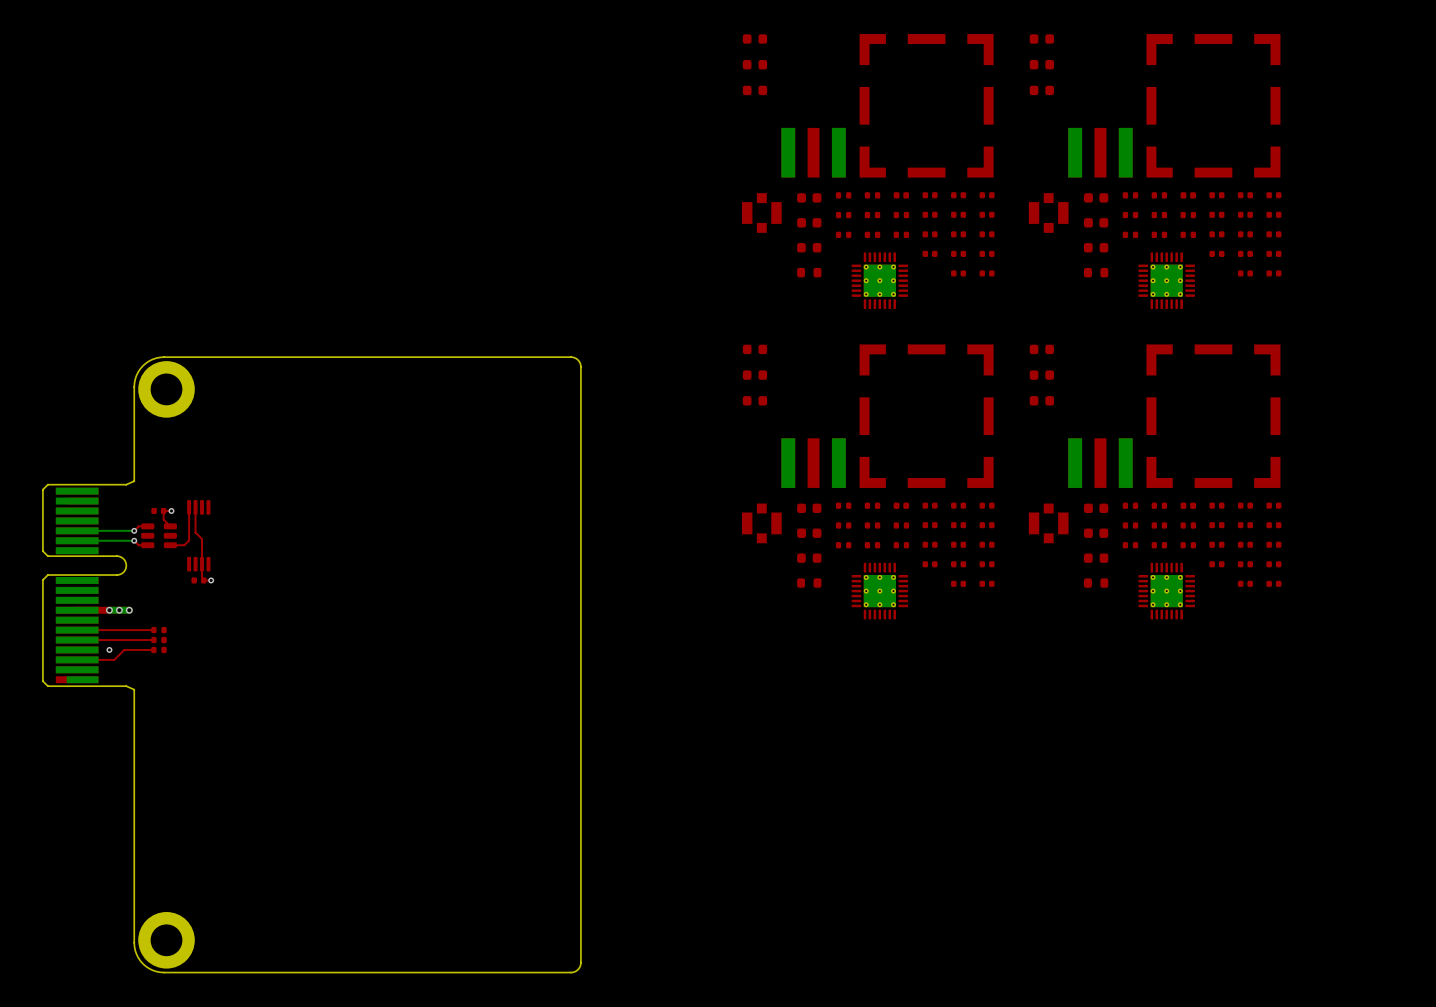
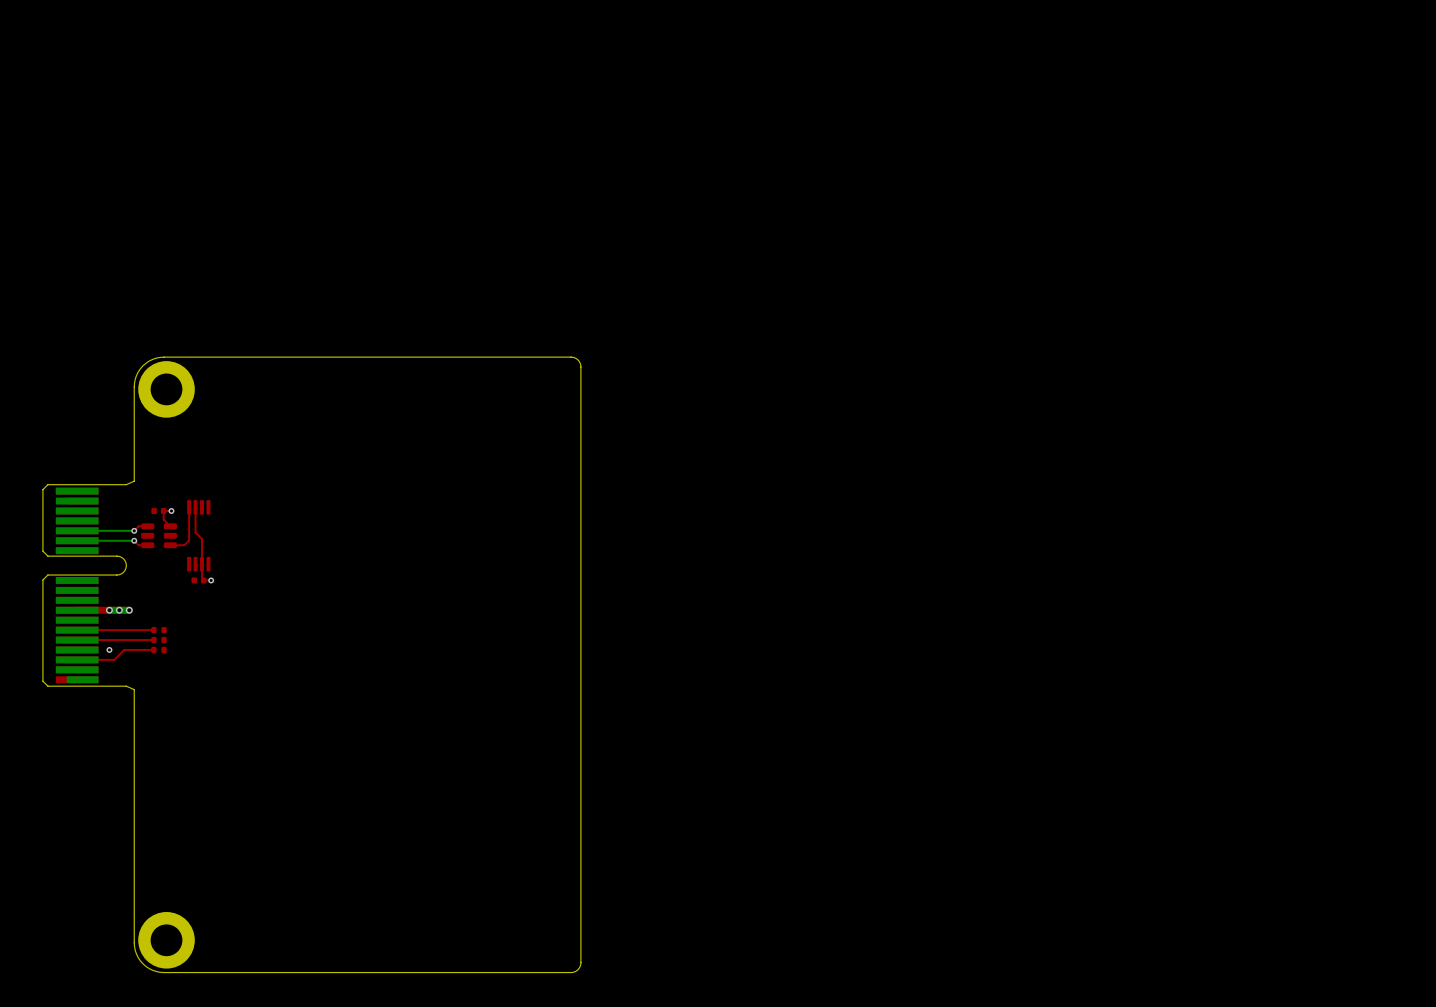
part: (754, 39) -> none
part: (1041, 39) -> none
part: (754, 64) -> none
part: (1041, 64) -> none
part: (754, 90) -> none
part: (1041, 90) -> none
part: (926, 105) -> none
part: (1213, 105) -> none
part: (813, 152) -> none
part: (1100, 152) -> none
part: (843, 195) -> none
part: (872, 195) -> none
part: (901, 195) -> none
part: (930, 195) -> none
part: (958, 195) -> none
part: (987, 195) -> none
part: (1130, 195) -> none
part: (1159, 195) -> none
part: (1188, 195) -> none
part: (1216, 195) -> none
part: (1245, 195) -> none
part: (1273, 195) -> none
part: (809, 197) -> none
part: (1096, 197) -> none
part: (761, 213) -> none
part: (1048, 213) -> none
part: (930, 214) -> none
part: (958, 214) -> none
part: (987, 214) -> none
part: (1216, 214) -> none
part: (1245, 214) -> none
part: (1273, 214) -> none
part: (843, 215) -> none
part: (872, 215) -> none
part: (901, 215) -> none
part: (1130, 215) -> none
part: (1159, 215) -> none
part: (1188, 215) -> none
part: (809, 222) -> none
part: (1096, 222) -> none
part: (843, 234) -> none
part: (872, 234) -> none
part: (901, 234) -> none
part: (930, 234) -> none
part: (958, 234) -> none
part: (987, 234) -> none
part: (1130, 234) -> none
part: (1159, 234) -> none
part: (1188, 234) -> none
part: (1216, 234) -> none
part: (1245, 234) -> none
part: (1273, 234) -> none
part: (809, 247) -> none
part: (1096, 247) -> none
part: (930, 253) -> none
part: (958, 253) -> none
part: (987, 253) -> none
part: (1216, 253) -> none
part: (1245, 253) -> none
part: (1273, 253) -> none
part: (809, 272) -> none
part: (1096, 272) -> none
part: (958, 273) -> none
part: (987, 273) -> none
part: (1245, 273) -> none
part: (1273, 273) -> none
part: (879, 280) -> none
part: (1166, 280) -> none
part: (754, 349) -> none
part: (1041, 349) -> none
part: (754, 375) -> none
part: (1041, 375) -> none
part: (754, 400) -> none
part: (1041, 400) -> none
part: (926, 416) -> none
part: (1213, 416) -> none
part: (813, 463) -> none
part: (1100, 463) -> none
part: (843, 505) -> none
part: (872, 505) -> none
part: (901, 505) -> none
part: (930, 505) -> none
part: (958, 505) -> none
part: (987, 505) -> none
part: (1130, 505) -> none
part: (1159, 505) -> none
part: (1188, 505) -> none
part: (1216, 505) -> none
part: (1245, 505) -> none
part: (1273, 505) -> none
part: (809, 508) -> none
part: (1096, 508) -> none
part: (761, 523) -> none
part: (1048, 523) -> none
part: (843, 525) -> none
part: (872, 525) -> none
part: (901, 525) -> none
part: (930, 525) -> none
part: (958, 525) -> none
part: (987, 525) -> none
part: (1130, 525) -> none
part: (1159, 525) -> none
part: (1188, 525) -> none
part: (1216, 525) -> none
part: (1245, 525) -> none
part: (1273, 525) -> none
part: (809, 533) -> none
part: (1096, 533) -> none
part: (930, 544) -> none
part: (958, 544) -> none
part: (987, 544) -> none
part: (1216, 544) -> none
part: (1245, 544) -> none
part: (1273, 544) -> none
part: (843, 545) -> none
part: (872, 545) -> none
part: (901, 545) -> none
part: (1130, 545) -> none
part: (1159, 545) -> none
part: (1188, 545) -> none
part: (809, 558) -> none
part: (1096, 558) -> none
part: (930, 564) -> none
part: (958, 564) -> none
part: (987, 564) -> none
part: (1216, 564) -> none
part: (1245, 564) -> none
part: (1273, 564) -> none
part: (809, 583) -> none
part: (958, 583) -> none
part: (987, 583) -> none
part: (1096, 583) -> none
part: (1245, 583) -> none
part: (1273, 583) -> none
part: (879, 591) -> none
part: (1166, 591) -> none

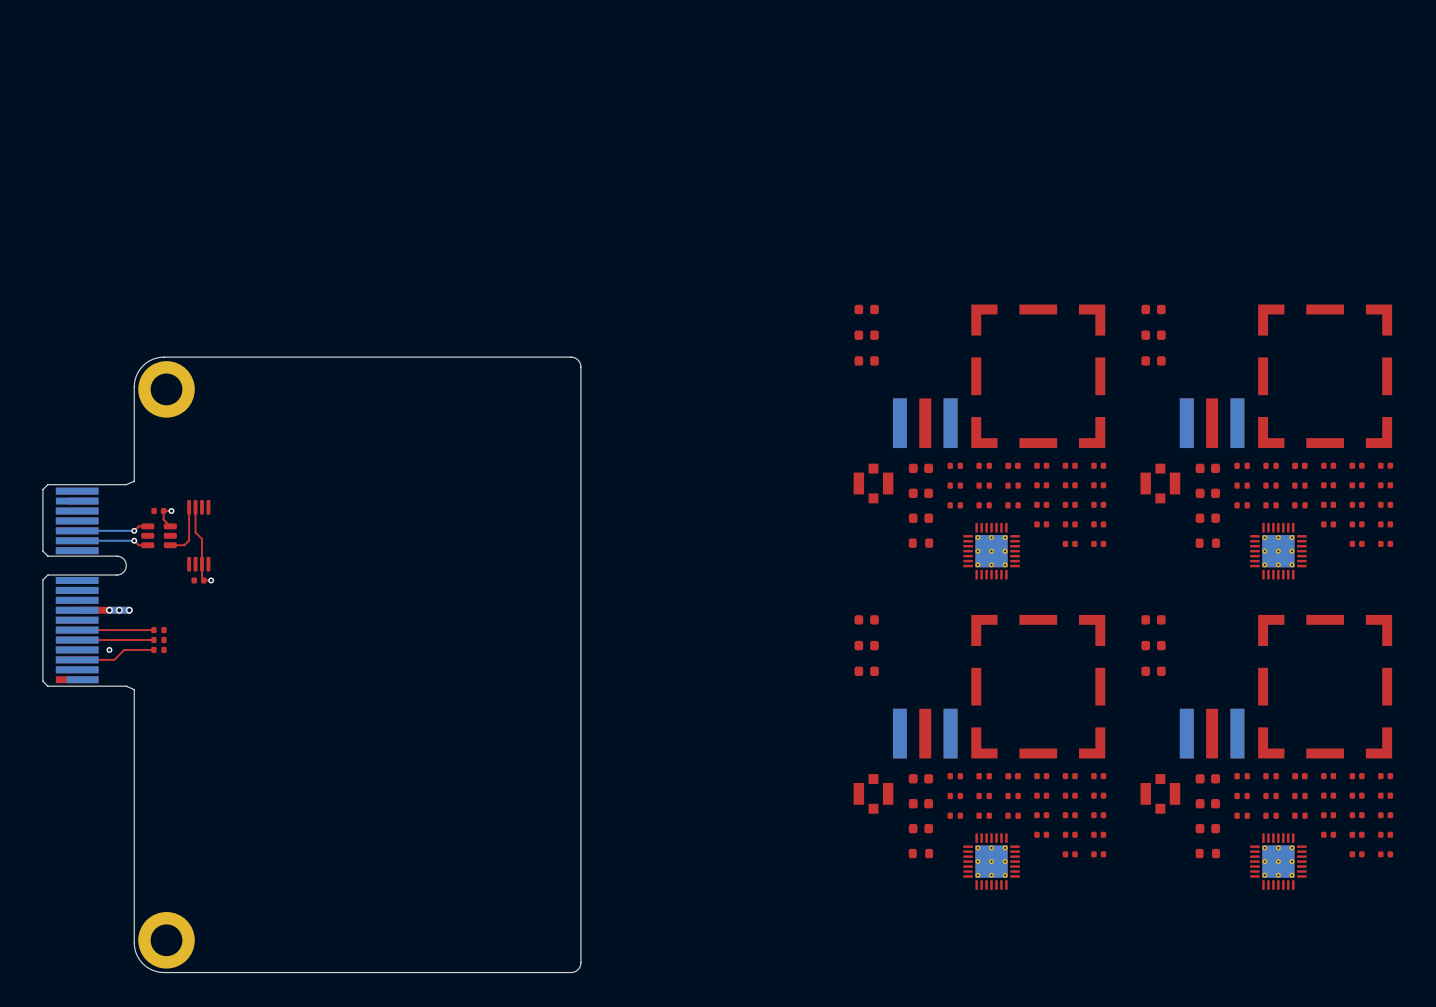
part: none -> (866, 309)
part: none -> (1153, 309)
part: none -> (866, 335)
part: none -> (1153, 335)
part: none -> (866, 360)
part: none -> (1153, 360)
part: none -> (1038, 376)
part: none -> (1325, 376)
part: none -> (925, 423)
part: none -> (1212, 423)
part: none -> (955, 465)
part: none -> (984, 465)
part: none -> (1013, 465)
part: none -> (1041, 465)
part: none -> (1070, 465)
part: none -> (1098, 465)
part: none -> (1242, 465)
part: none -> (1271, 465)
part: none -> (1299, 465)
part: none -> (1328, 465)
part: none -> (1357, 465)
part: none -> (1385, 465)
part: none -> (920, 468)
part: none -> (1207, 468)
part: none -> (873, 483)
part: none -> (1160, 483)
part: none -> (955, 485)
part: none -> (984, 485)
part: none -> (1013, 485)
part: none -> (1041, 485)
part: none -> (1070, 485)
part: none -> (1098, 485)
part: none -> (1242, 485)
part: none -> (1271, 485)
part: none -> (1299, 485)
part: none -> (1328, 485)
part: none -> (1357, 485)
part: none -> (1385, 485)
part: none -> (920, 493)
part: none -> (1207, 493)
part: none -> (1041, 504)
part: none -> (1070, 504)
part: none -> (1098, 504)
part: none -> (1328, 504)
part: none -> (1357, 504)
part: none -> (1385, 504)
part: none -> (955, 505)
part: none -> (984, 505)
part: none -> (1013, 505)
part: none -> (1242, 505)
part: none -> (1271, 505)
part: none -> (1299, 505)
part: none -> (920, 518)
part: none -> (1207, 518)
part: none -> (1041, 524)
part: none -> (1070, 524)
part: none -> (1098, 524)
part: none -> (1328, 524)
part: none -> (1357, 524)
part: none -> (1385, 524)
part: none -> (920, 543)
part: none -> (1070, 543)
part: none -> (1098, 543)
part: none -> (1207, 543)
part: none -> (1357, 543)
part: none -> (1385, 543)
part: none -> (991, 551)
part: none -> (1278, 551)
part: none -> (866, 619)
part: none -> (1153, 619)
part: none -> (866, 645)
part: none -> (1153, 645)
part: none -> (866, 671)
part: none -> (1153, 671)
part: none -> (1038, 686)
part: none -> (1325, 686)
part: none -> (925, 733)
part: none -> (1212, 733)
part: none -> (955, 776)
part: none -> (984, 776)
part: none -> (1013, 776)
part: none -> (1041, 776)
part: none -> (1070, 776)
part: none -> (1098, 776)
part: none -> (1242, 776)
part: none -> (1271, 776)
part: none -> (1299, 776)
part: none -> (1328, 776)
part: none -> (1357, 776)
part: none -> (1385, 776)
part: none -> (920, 778)
part: none -> (1207, 778)
part: none -> (873, 793)
part: none -> (1160, 793)
part: none -> (955, 795)
part: none -> (984, 795)
part: none -> (1013, 795)
part: none -> (1041, 795)
part: none -> (1070, 795)
part: none -> (1098, 795)
part: none -> (1242, 795)
part: none -> (1271, 795)
part: none -> (1299, 795)
part: none -> (1328, 795)
part: none -> (1357, 795)
part: none -> (1385, 795)
part: none -> (920, 803)
part: none -> (1207, 803)
part: none -> (955, 815)
part: none -> (984, 815)
part: none -> (1013, 815)
part: none -> (1041, 815)
part: none -> (1070, 815)
part: none -> (1098, 815)
part: none -> (1242, 815)
part: none -> (1271, 815)
part: none -> (1299, 815)
part: none -> (1328, 815)
part: none -> (1357, 815)
part: none -> (1385, 815)
part: none -> (920, 828)
part: none -> (1207, 828)
part: none -> (1041, 834)
part: none -> (1070, 834)
part: none -> (1098, 834)
part: none -> (1328, 834)
part: none -> (1357, 834)
part: none -> (1385, 834)
part: none -> (920, 853)
part: none -> (1207, 853)
part: none -> (1070, 854)
part: none -> (1098, 854)
part: none -> (1357, 854)
part: none -> (1385, 854)
part: none -> (991, 861)
part: none -> (1278, 861)

